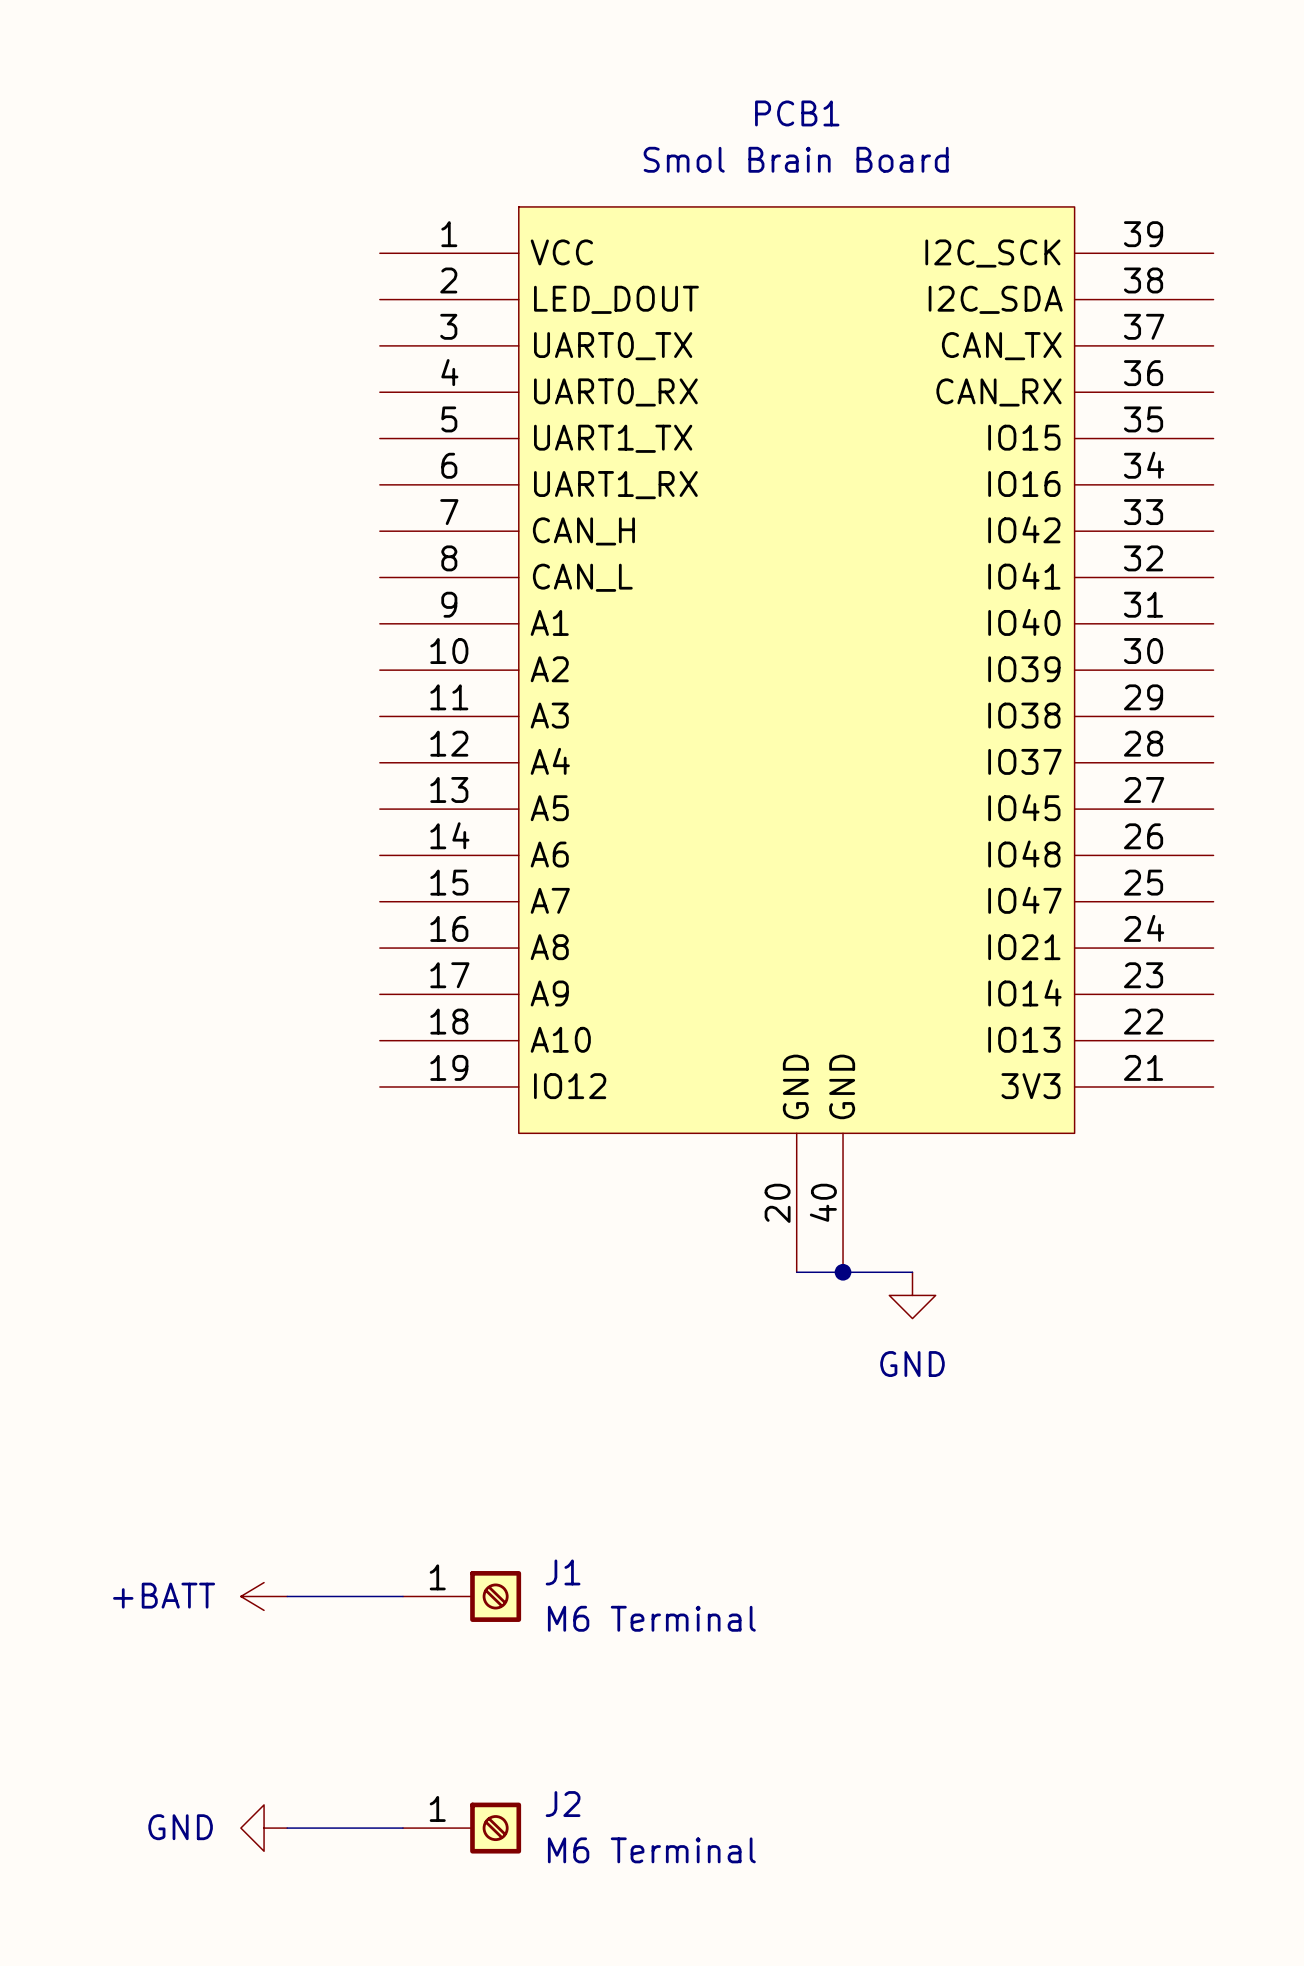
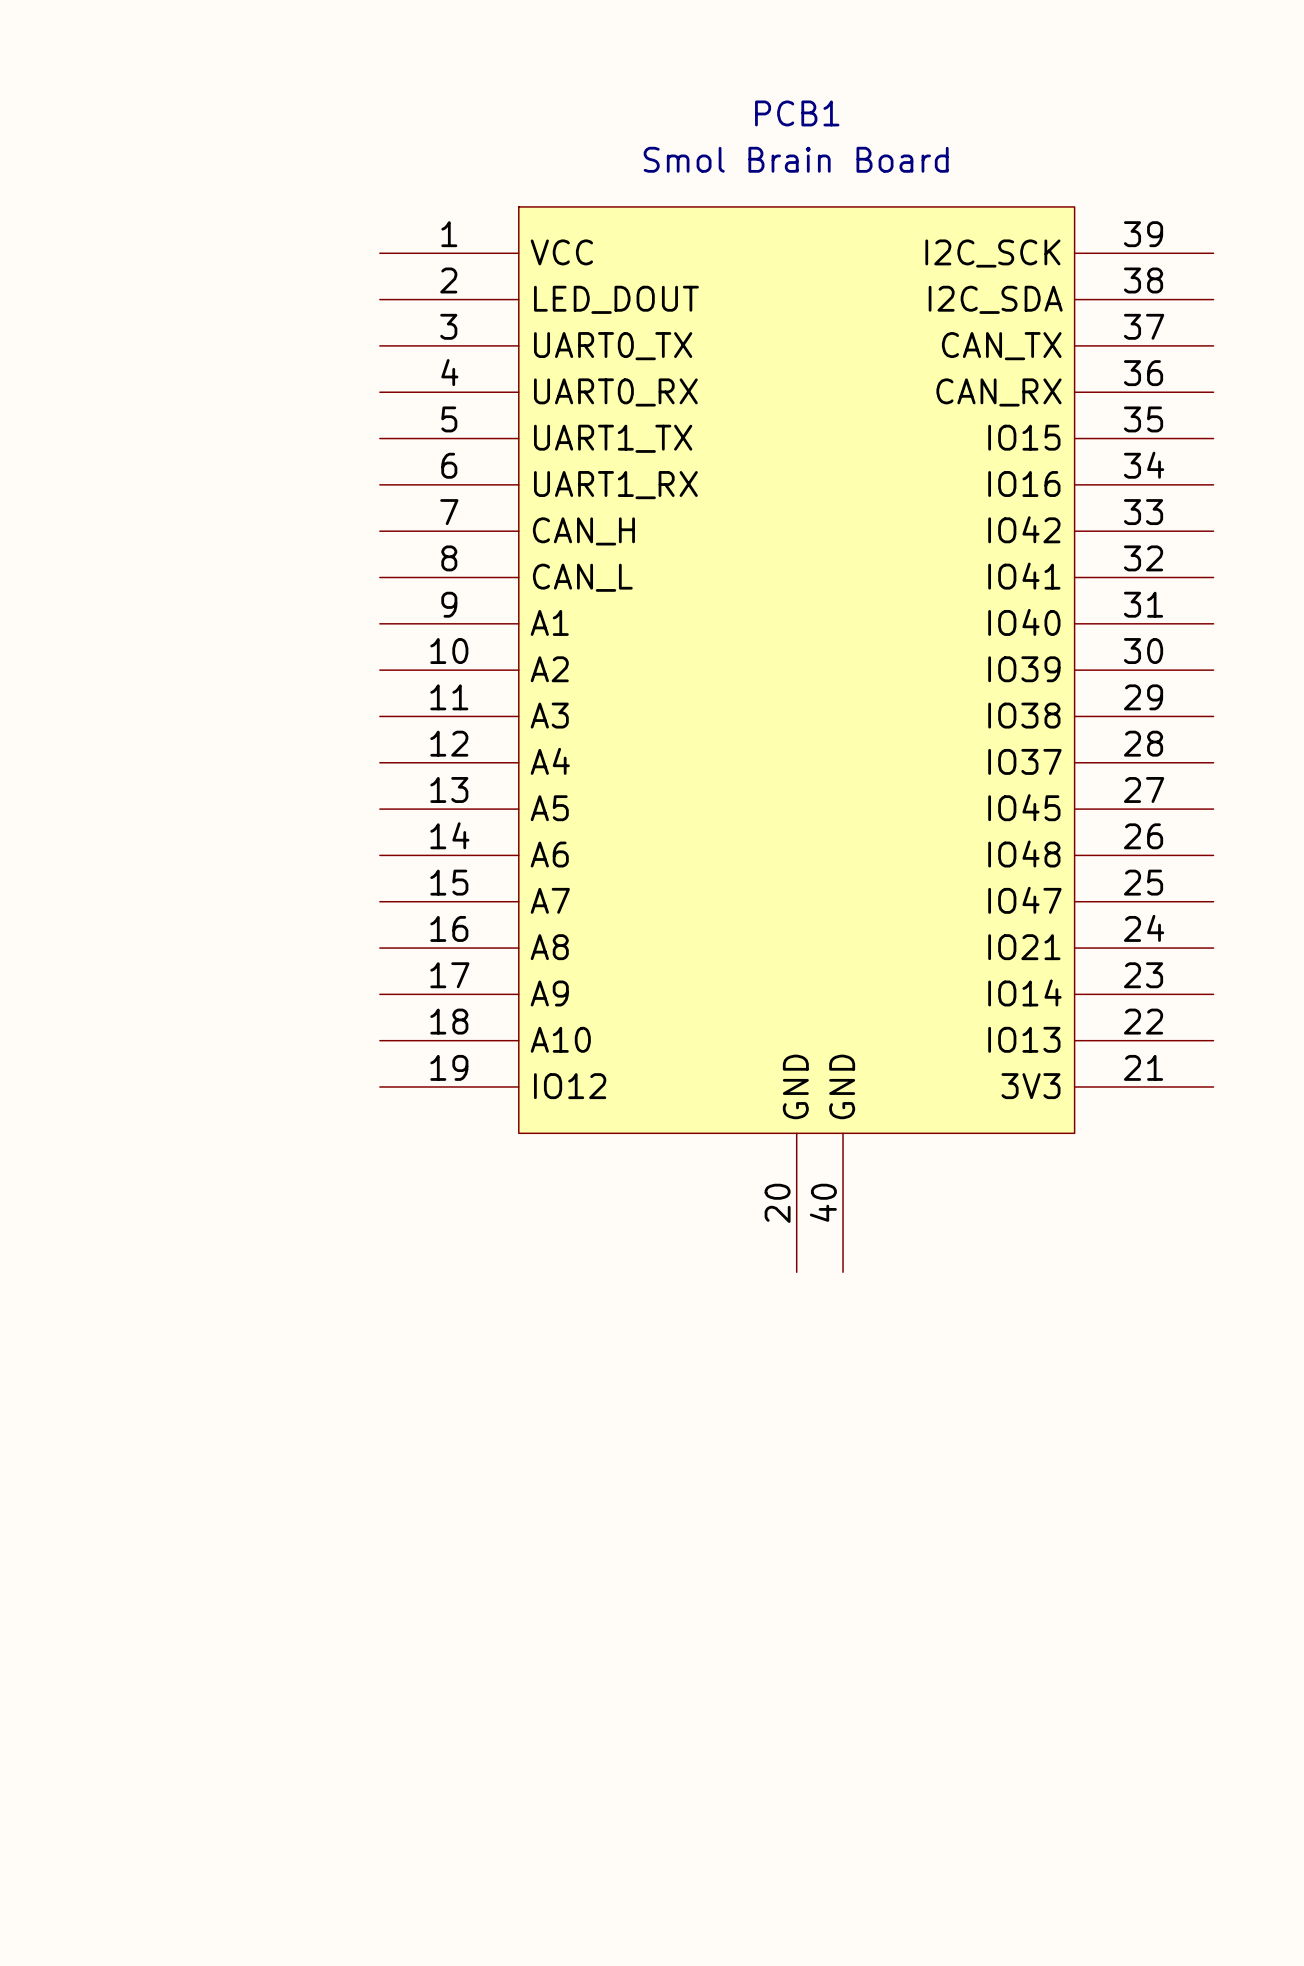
wire: (796, 1272) (912, 1272) -> none
junction: (843, 1272) -> none
power symbol: GND (912, 1295) -> none
power symbol: +BATT (264, 1596) -> none
wire: (287, 1596) (403, 1596) -> none
J1: M6 Terminal (462, 1596) -> none
power symbol: GND (264, 1828) -> none
wire: (287, 1828) (403, 1828) -> none
J2: M6 Terminal (462, 1828) -> none

